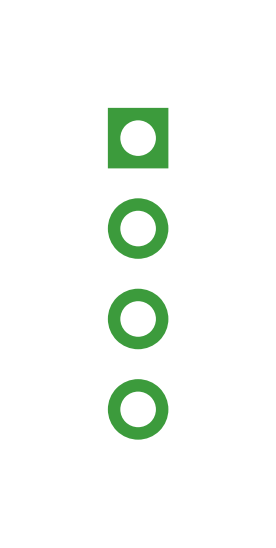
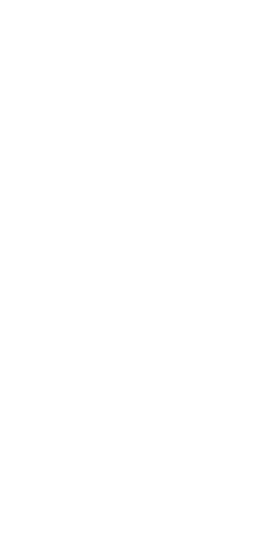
part: (138, 273) -> none

